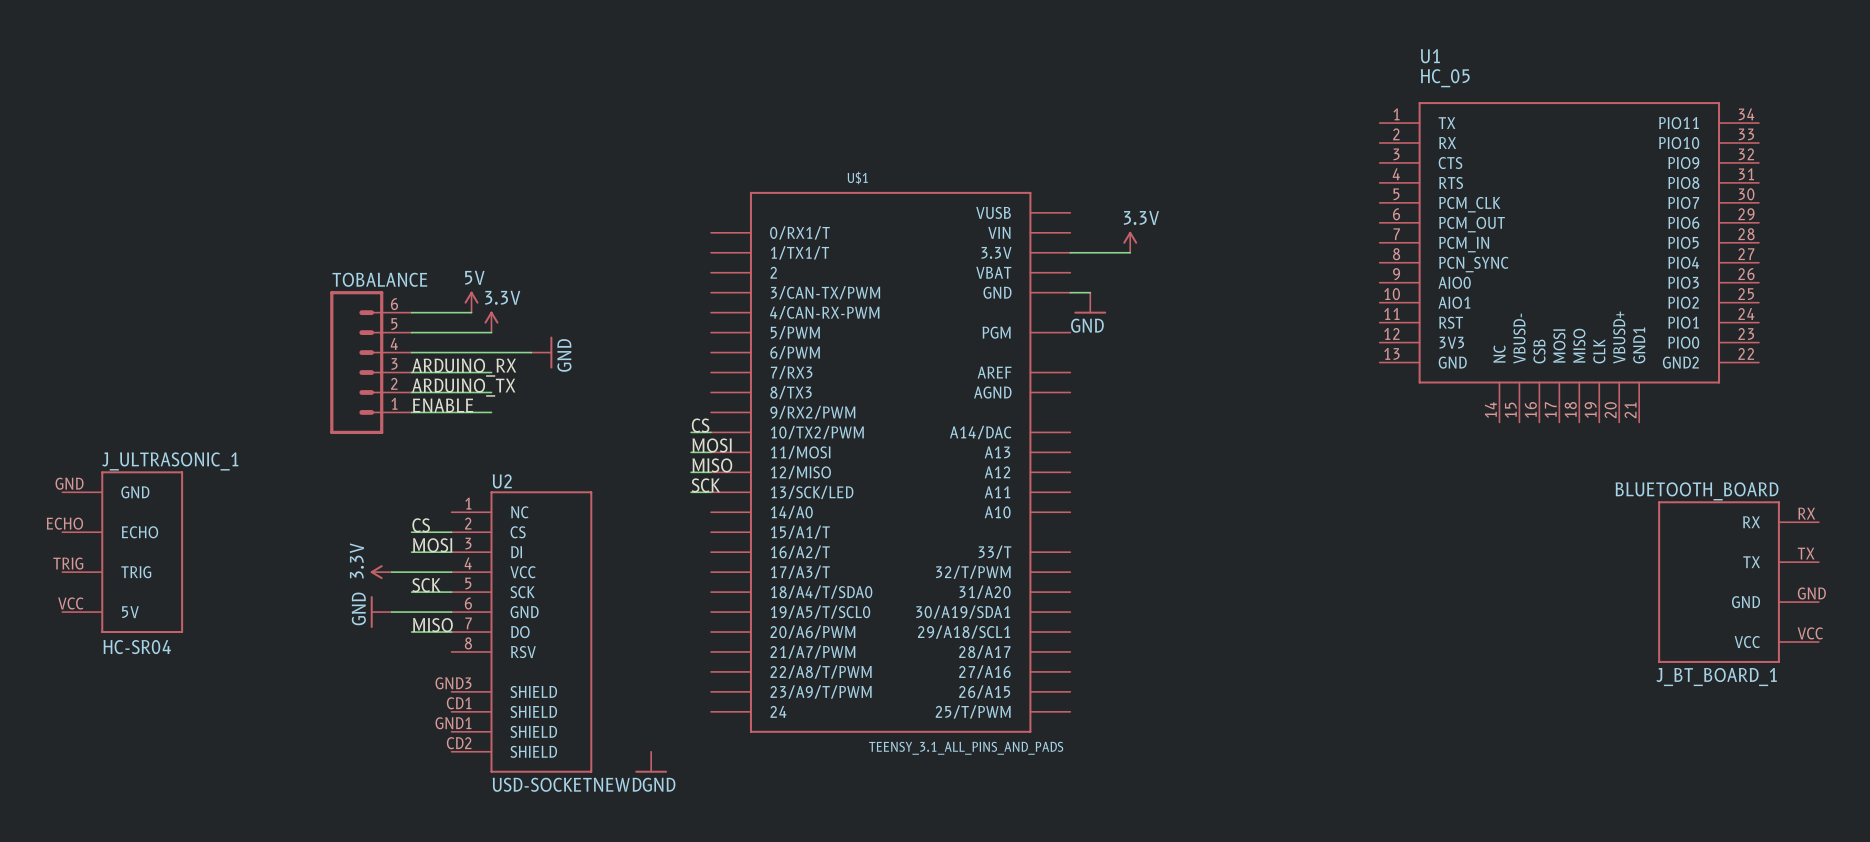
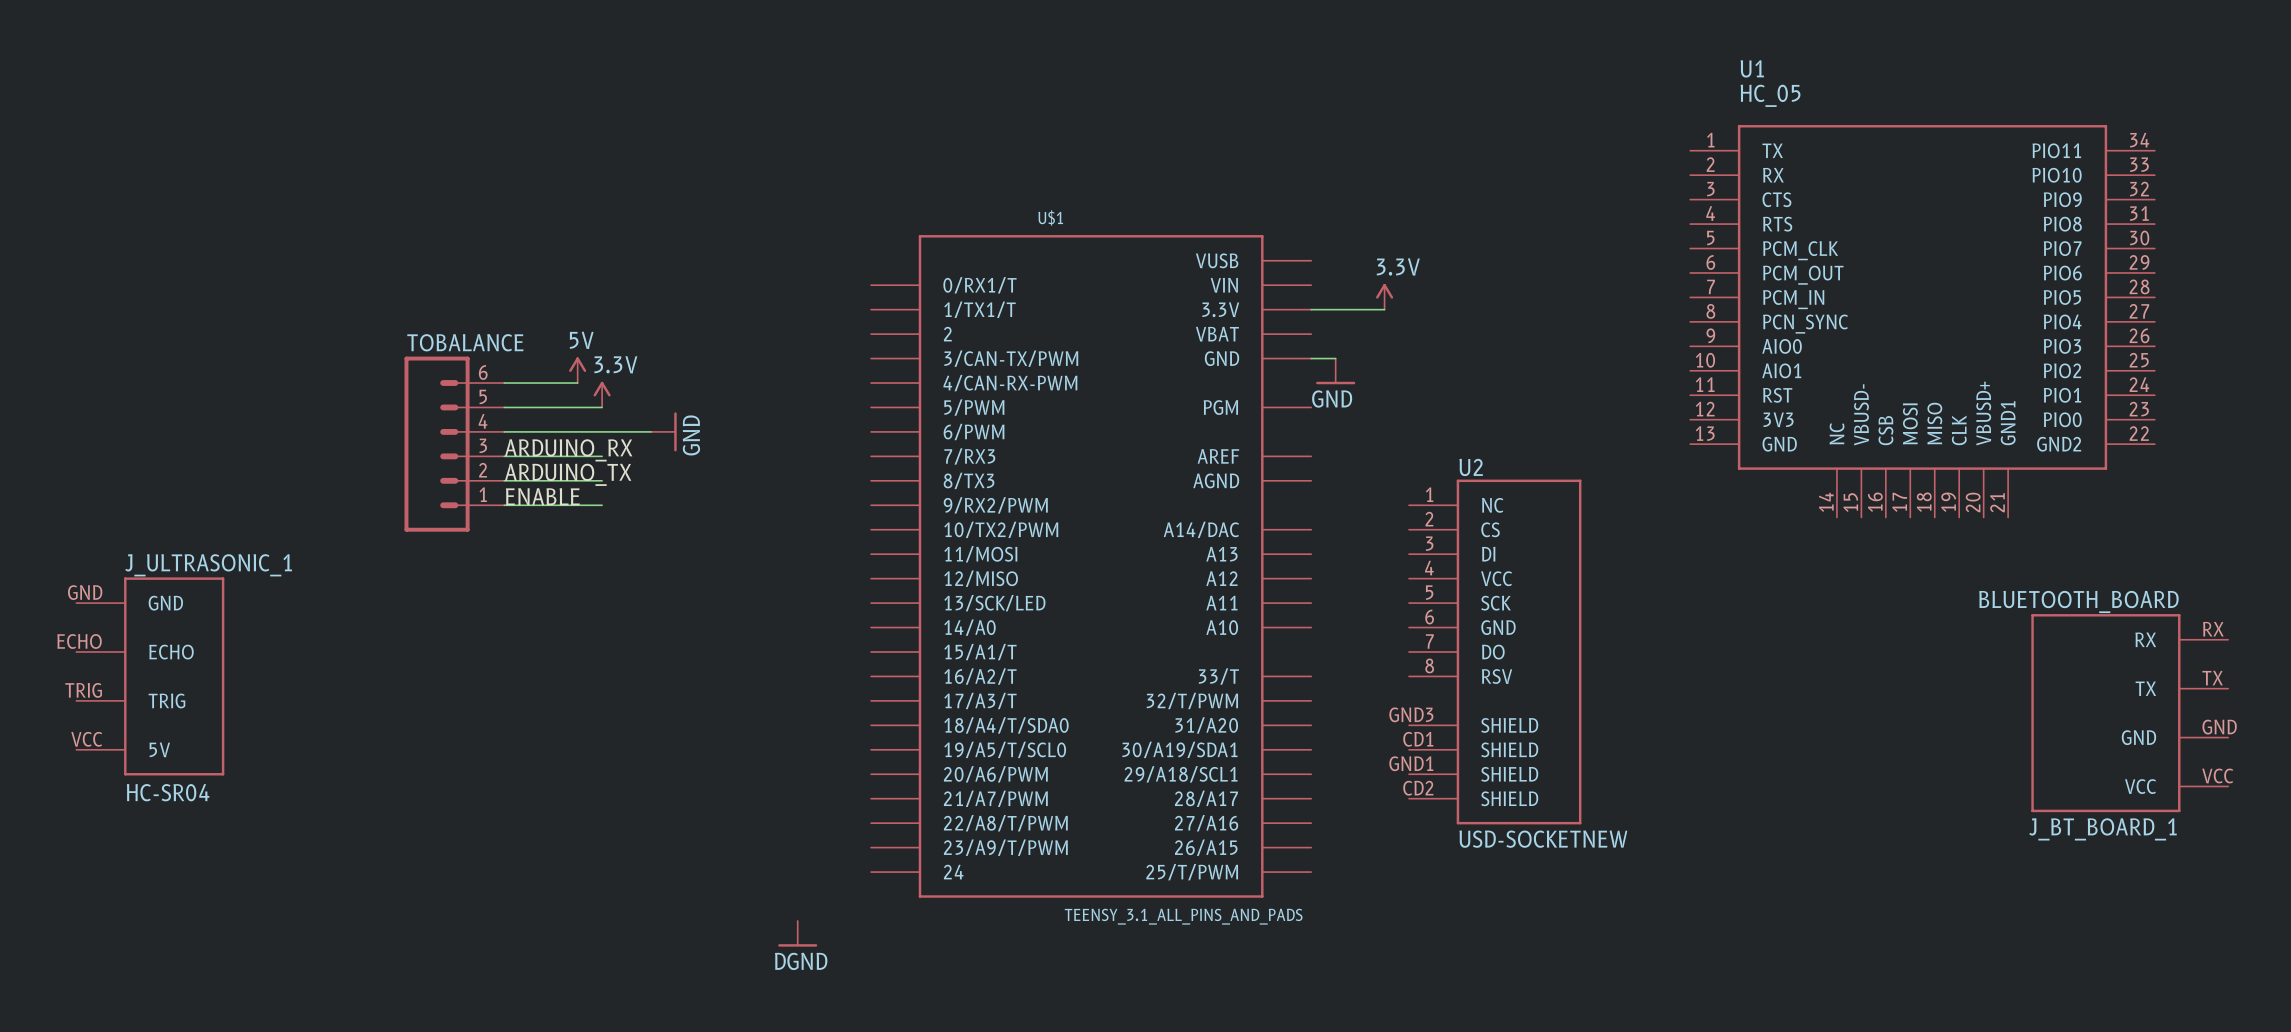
label: CS (700, 425) -> none
wire: (691, 432) (711, 432) -> none
label: MOSI (712, 445) -> none
wire: (691, 452) (711, 452) -> none
label: MISO (712, 465) -> none
wire: (691, 472) (711, 472) -> none
label: SCK (705, 485) -> none
wire: (691, 492) (711, 492) -> none
label: CS (421, 525) -> none
wire: (411, 532) (451, 532) -> none
label: MOSI (432, 545) -> none
wire: (411, 552) (451, 552) -> none
power symbol: 3.3V (381, 572) -> none
wire: (391, 572) (451, 572) -> none
label: SCK (426, 585) -> none
wire: (411, 592) (451, 592) -> none
power symbol: GND (381, 612) -> none
wire: (391, 612) (451, 612) -> none
label: MISO (432, 625) -> none
wire: (411, 632) (451, 632) -> none
U2 position: (521, 632) -> (1495, 651)

